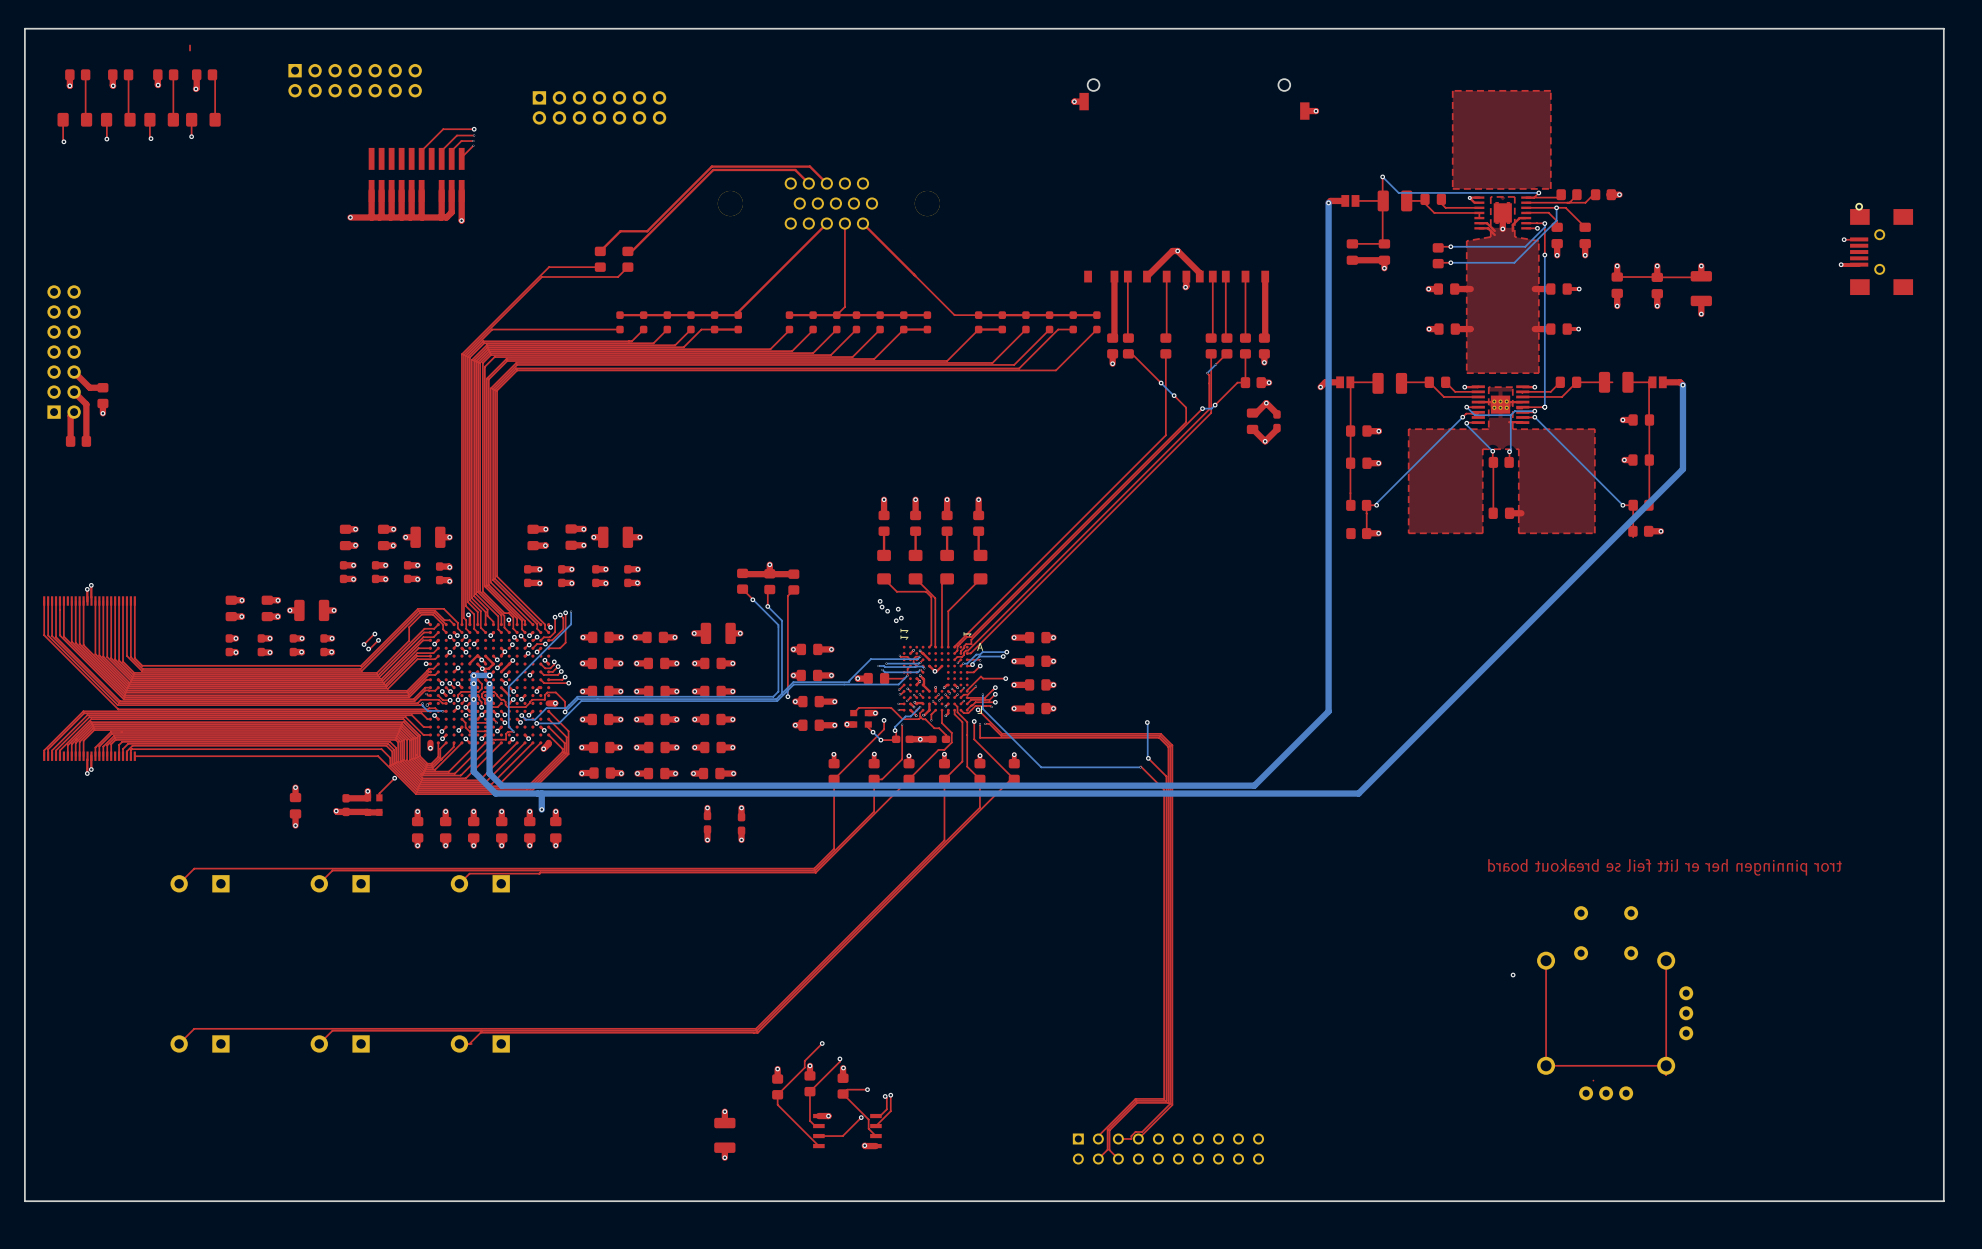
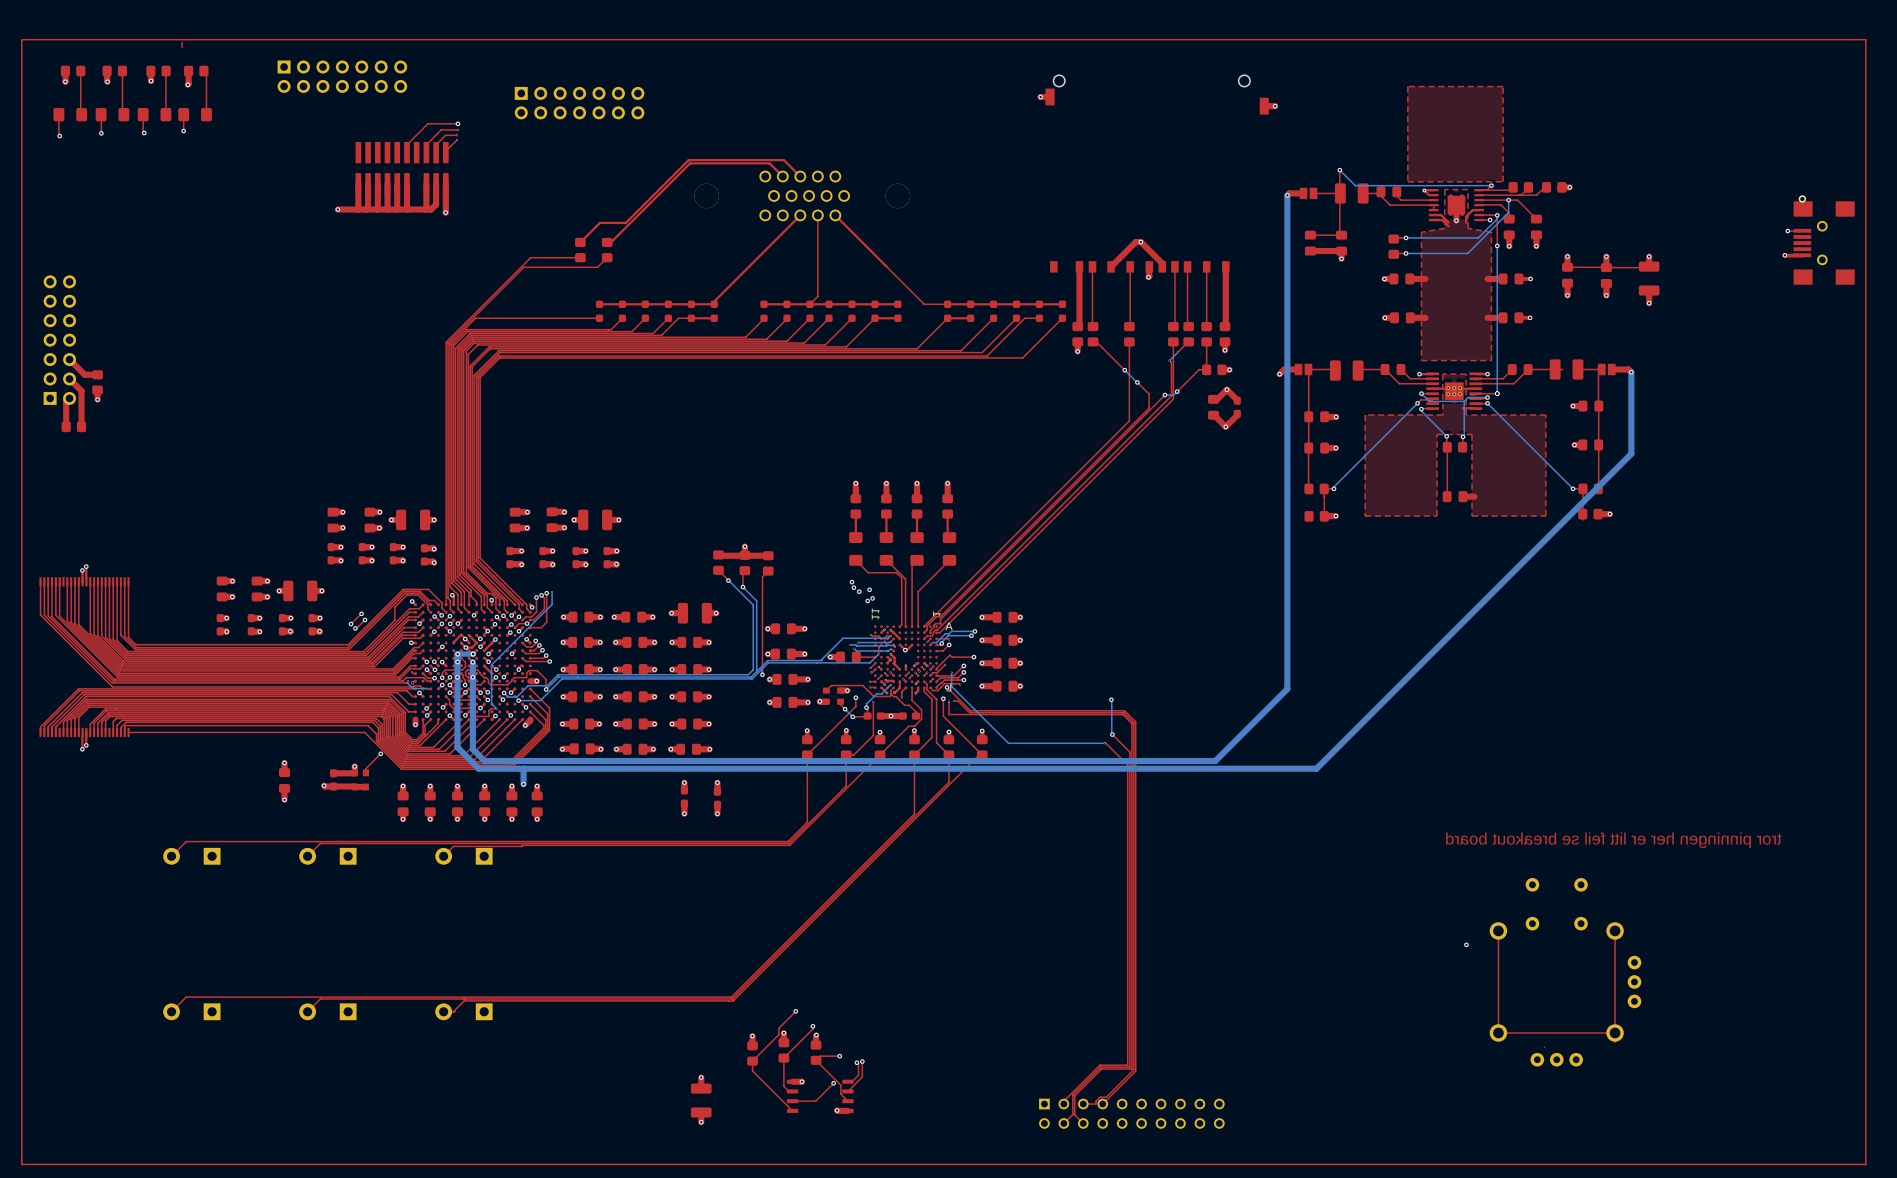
board edge: (1943, 28) (24, 28) (24, 1201) (1943, 1201) (1943, 28) -> none
top track: none -> (1865, 39) (21, 39) (21, 1164) (1865, 1164) (1865, 39)

